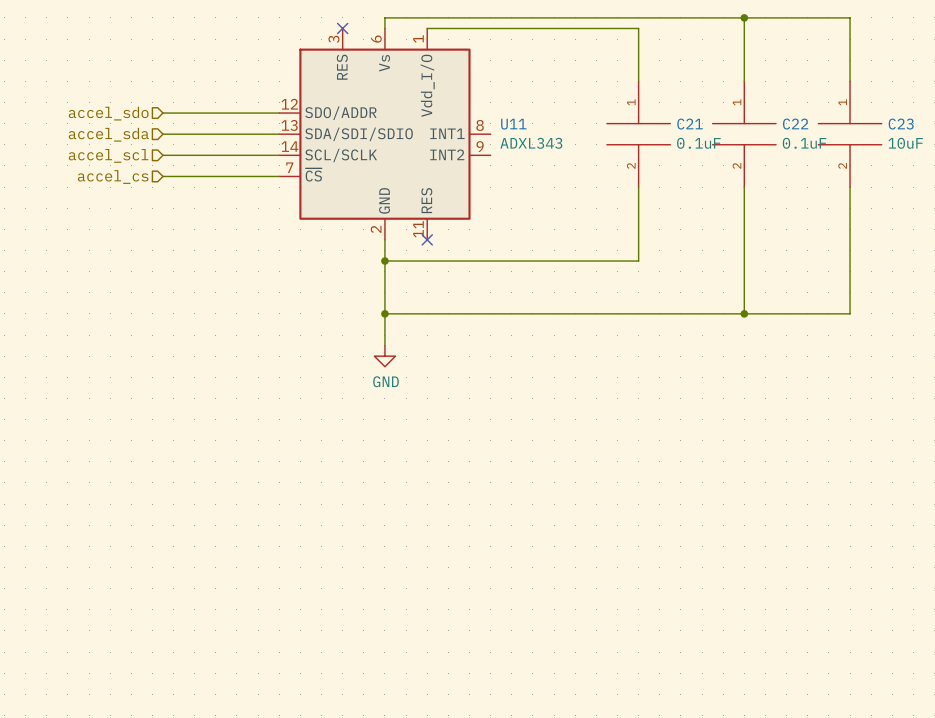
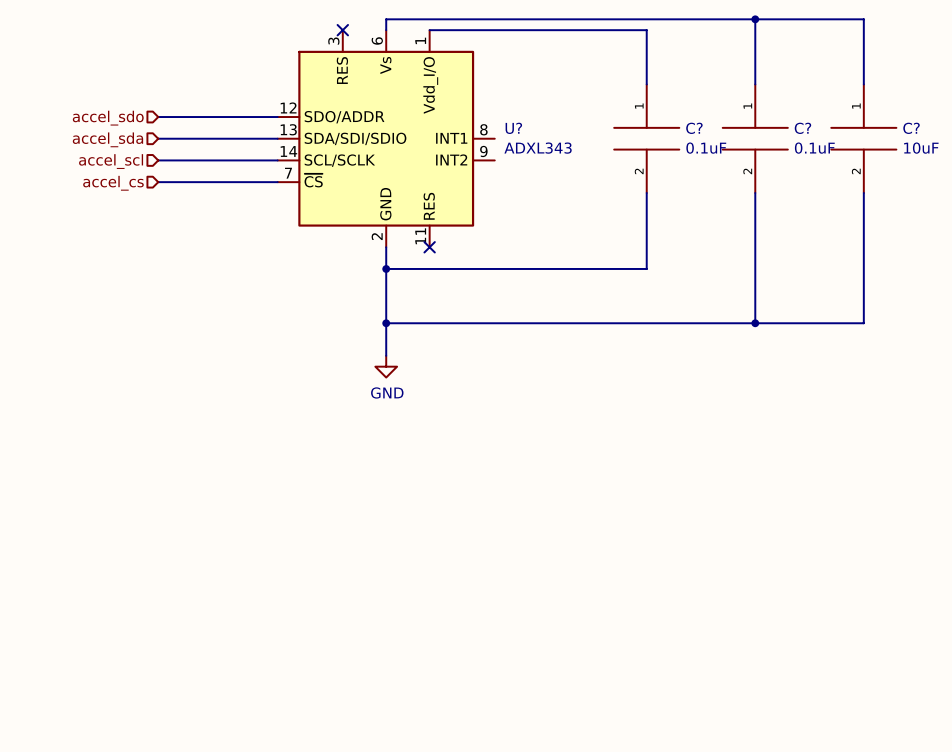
U11 name: U11 (513, 124) -> U? (513, 128)
C21 name: C21 (690, 124) -> C? (694, 128)
C22 name: C22 (795, 124) -> C? (802, 128)
C23 name: C23 (901, 124) -> C? (911, 128)

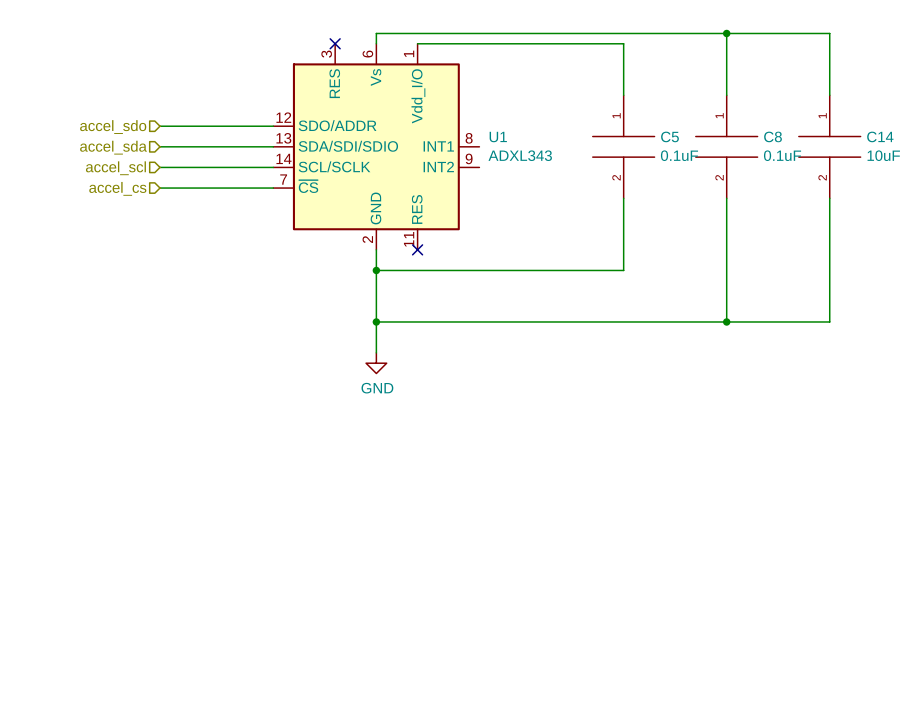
U? name: U? (513, 128) -> U1 (498, 137)
C? name: C? (694, 128) -> C5 (669, 136)
C? name: C? (802, 128) -> C8 (773, 136)
C? name: C? (911, 128) -> C14 (880, 136)

